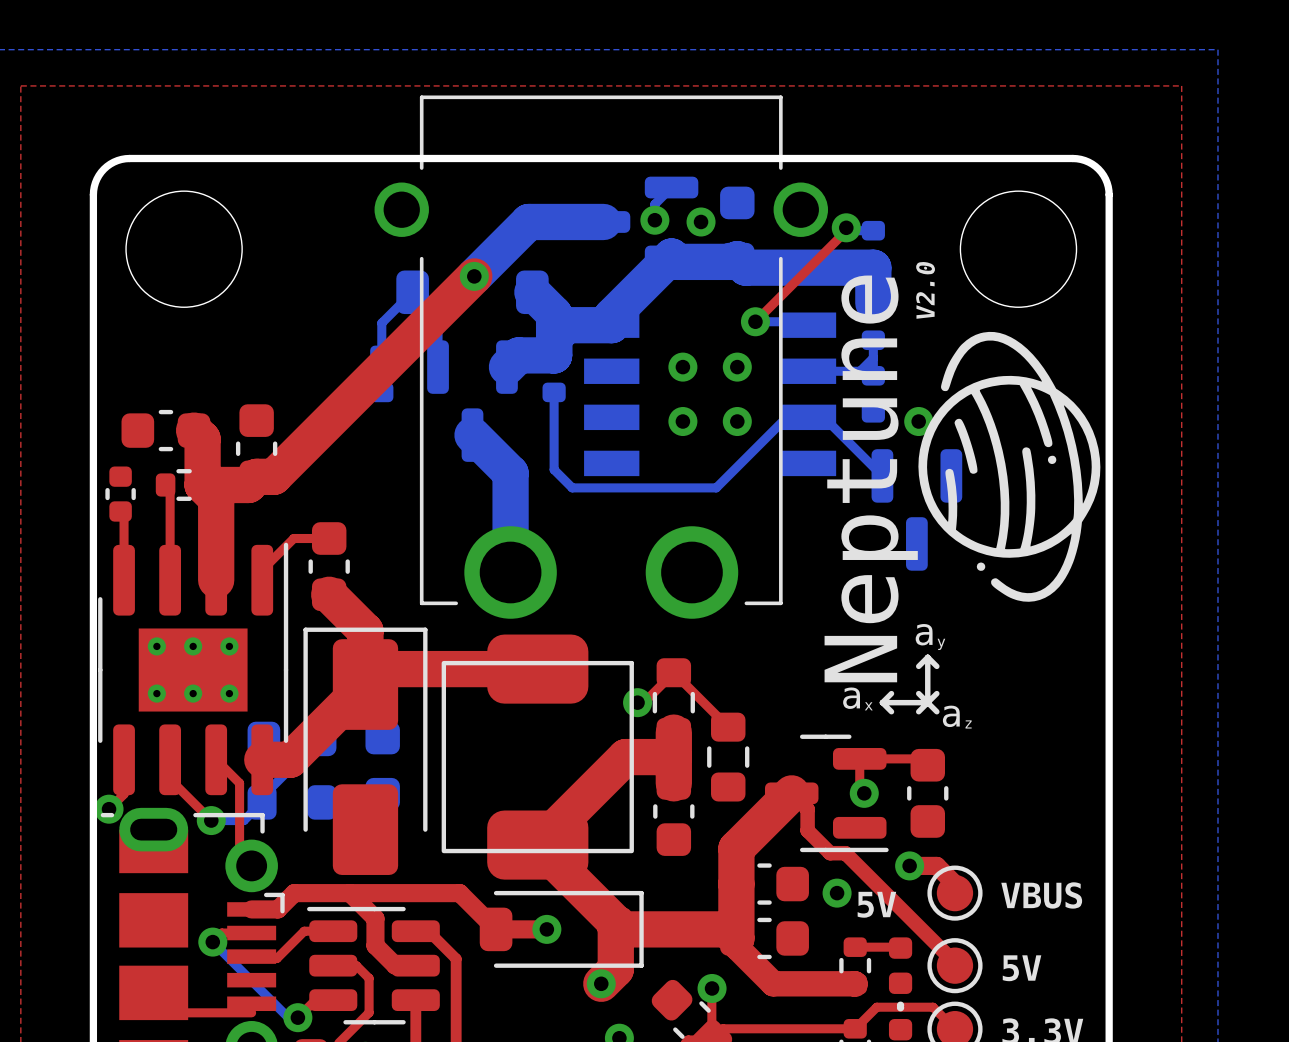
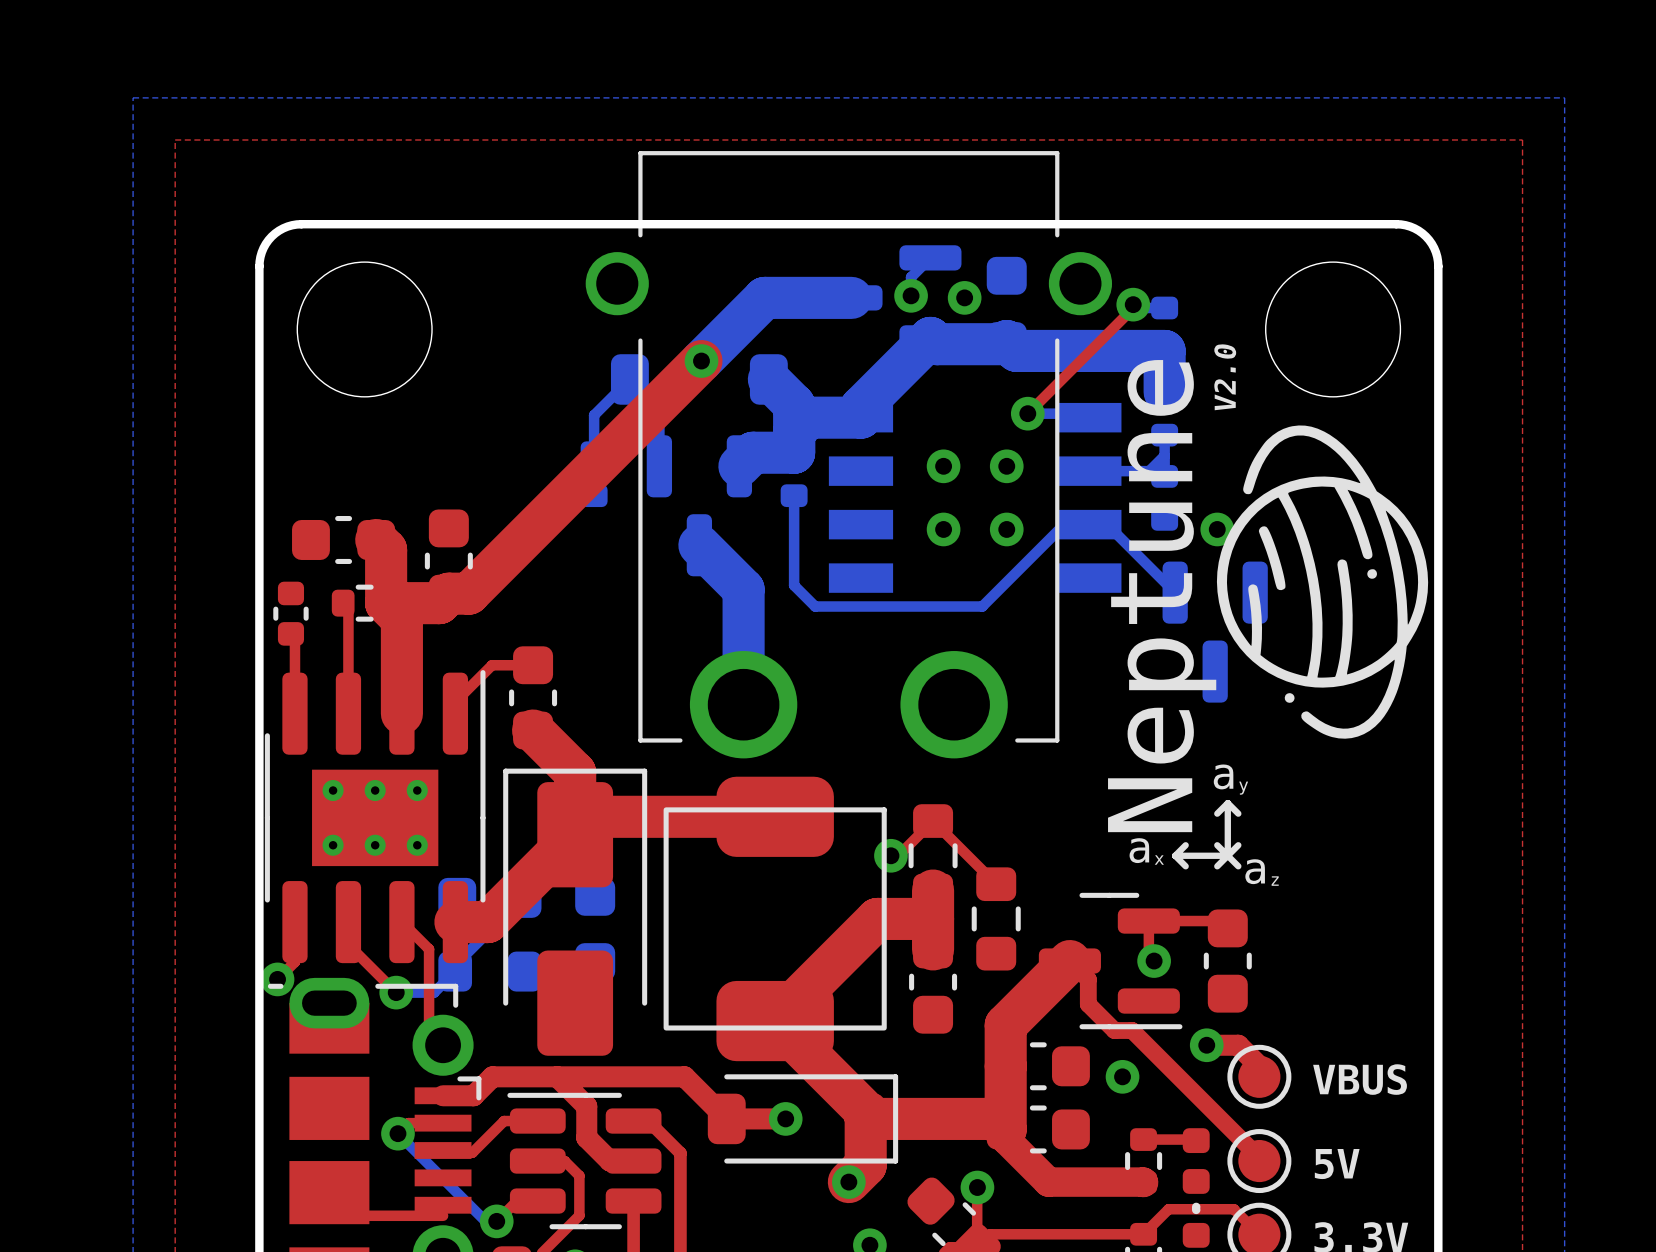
text: 5V (876, 904) -> none

